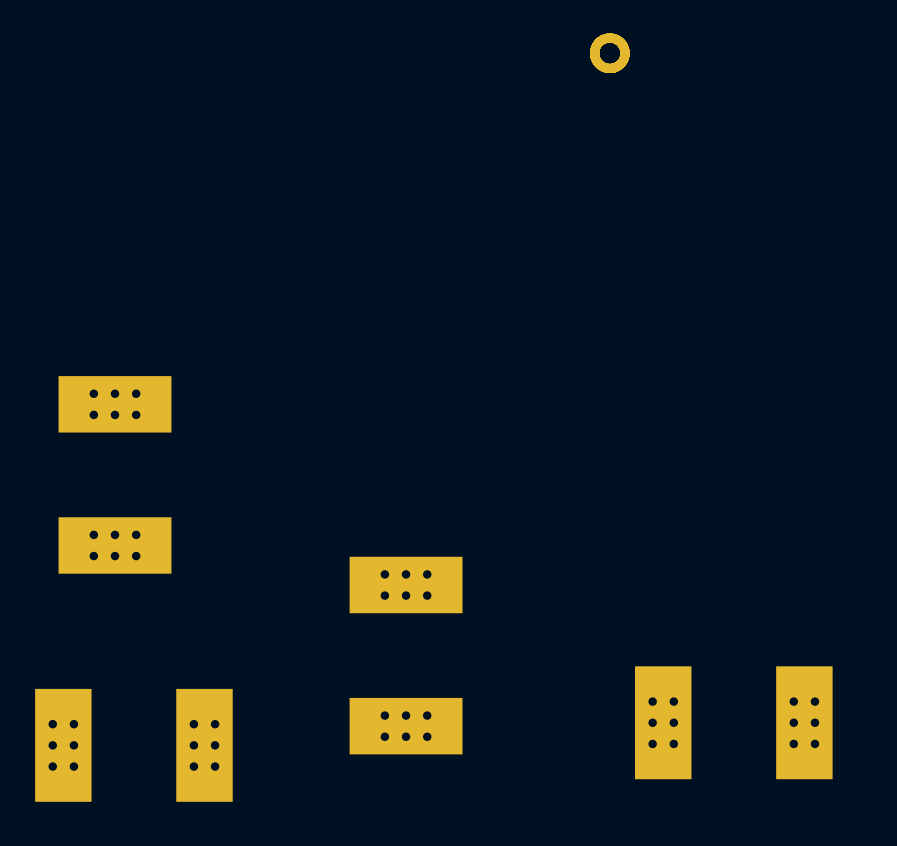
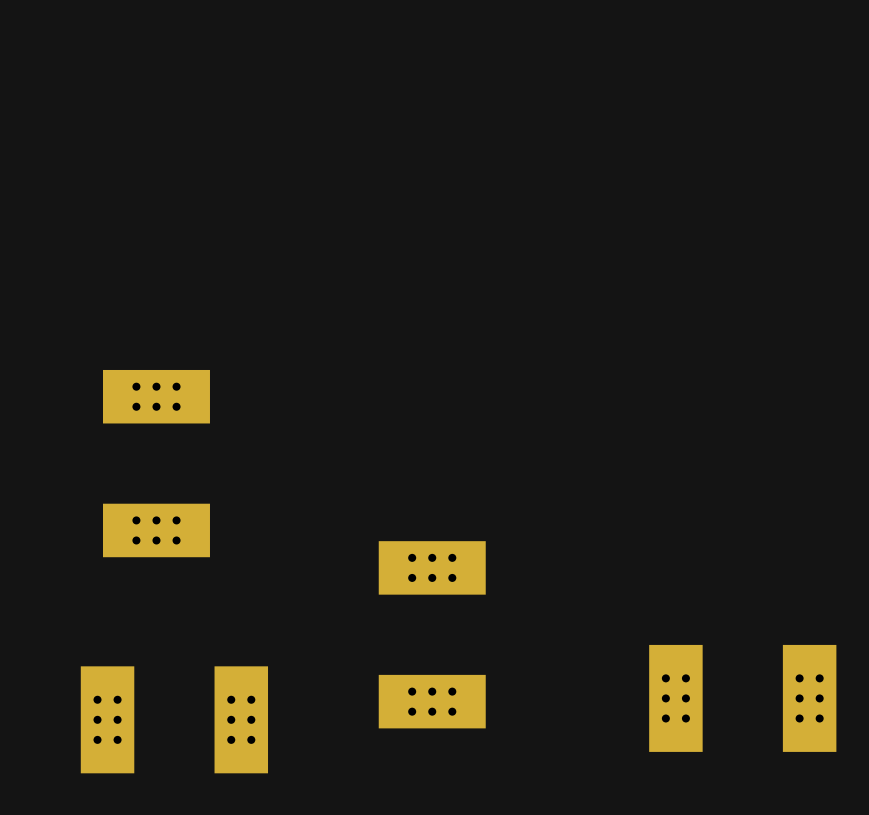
part: (609, 53) -> none

